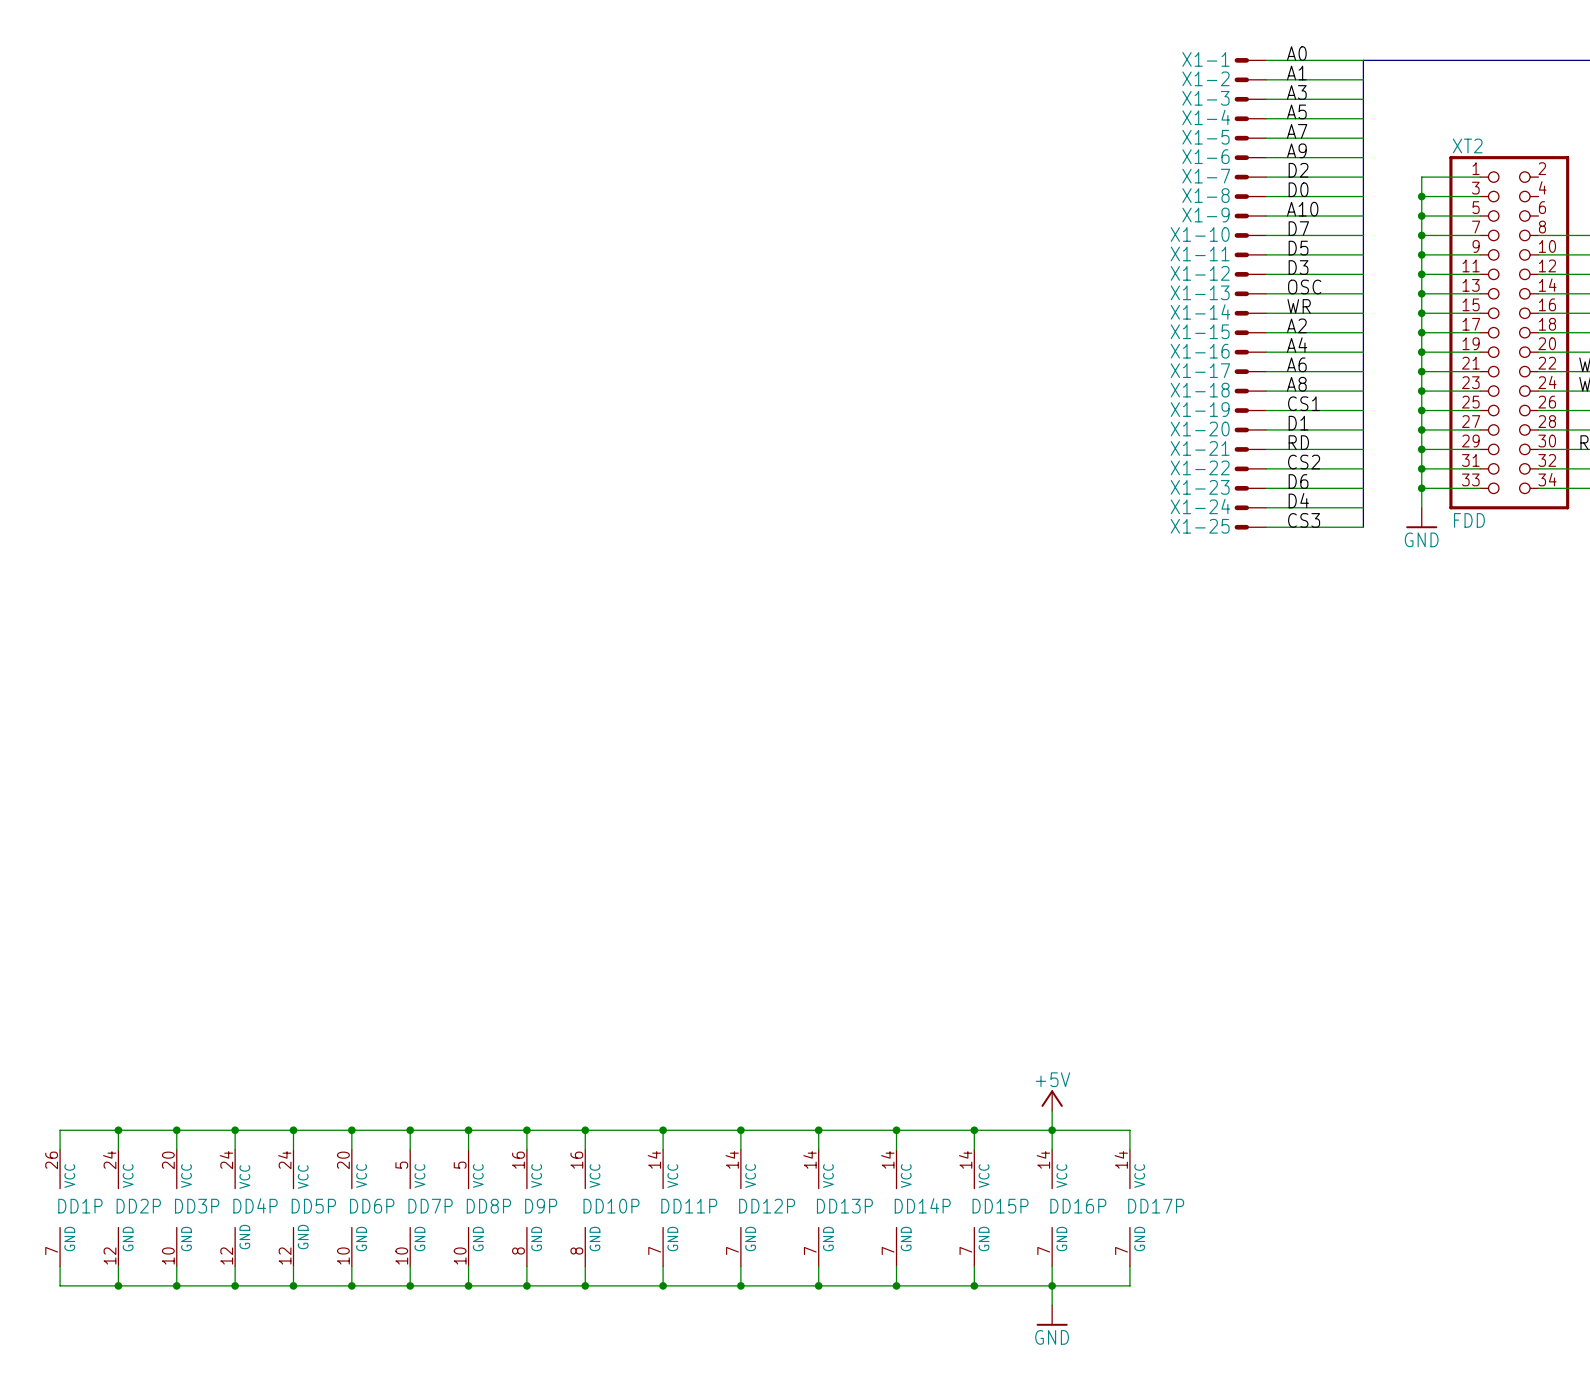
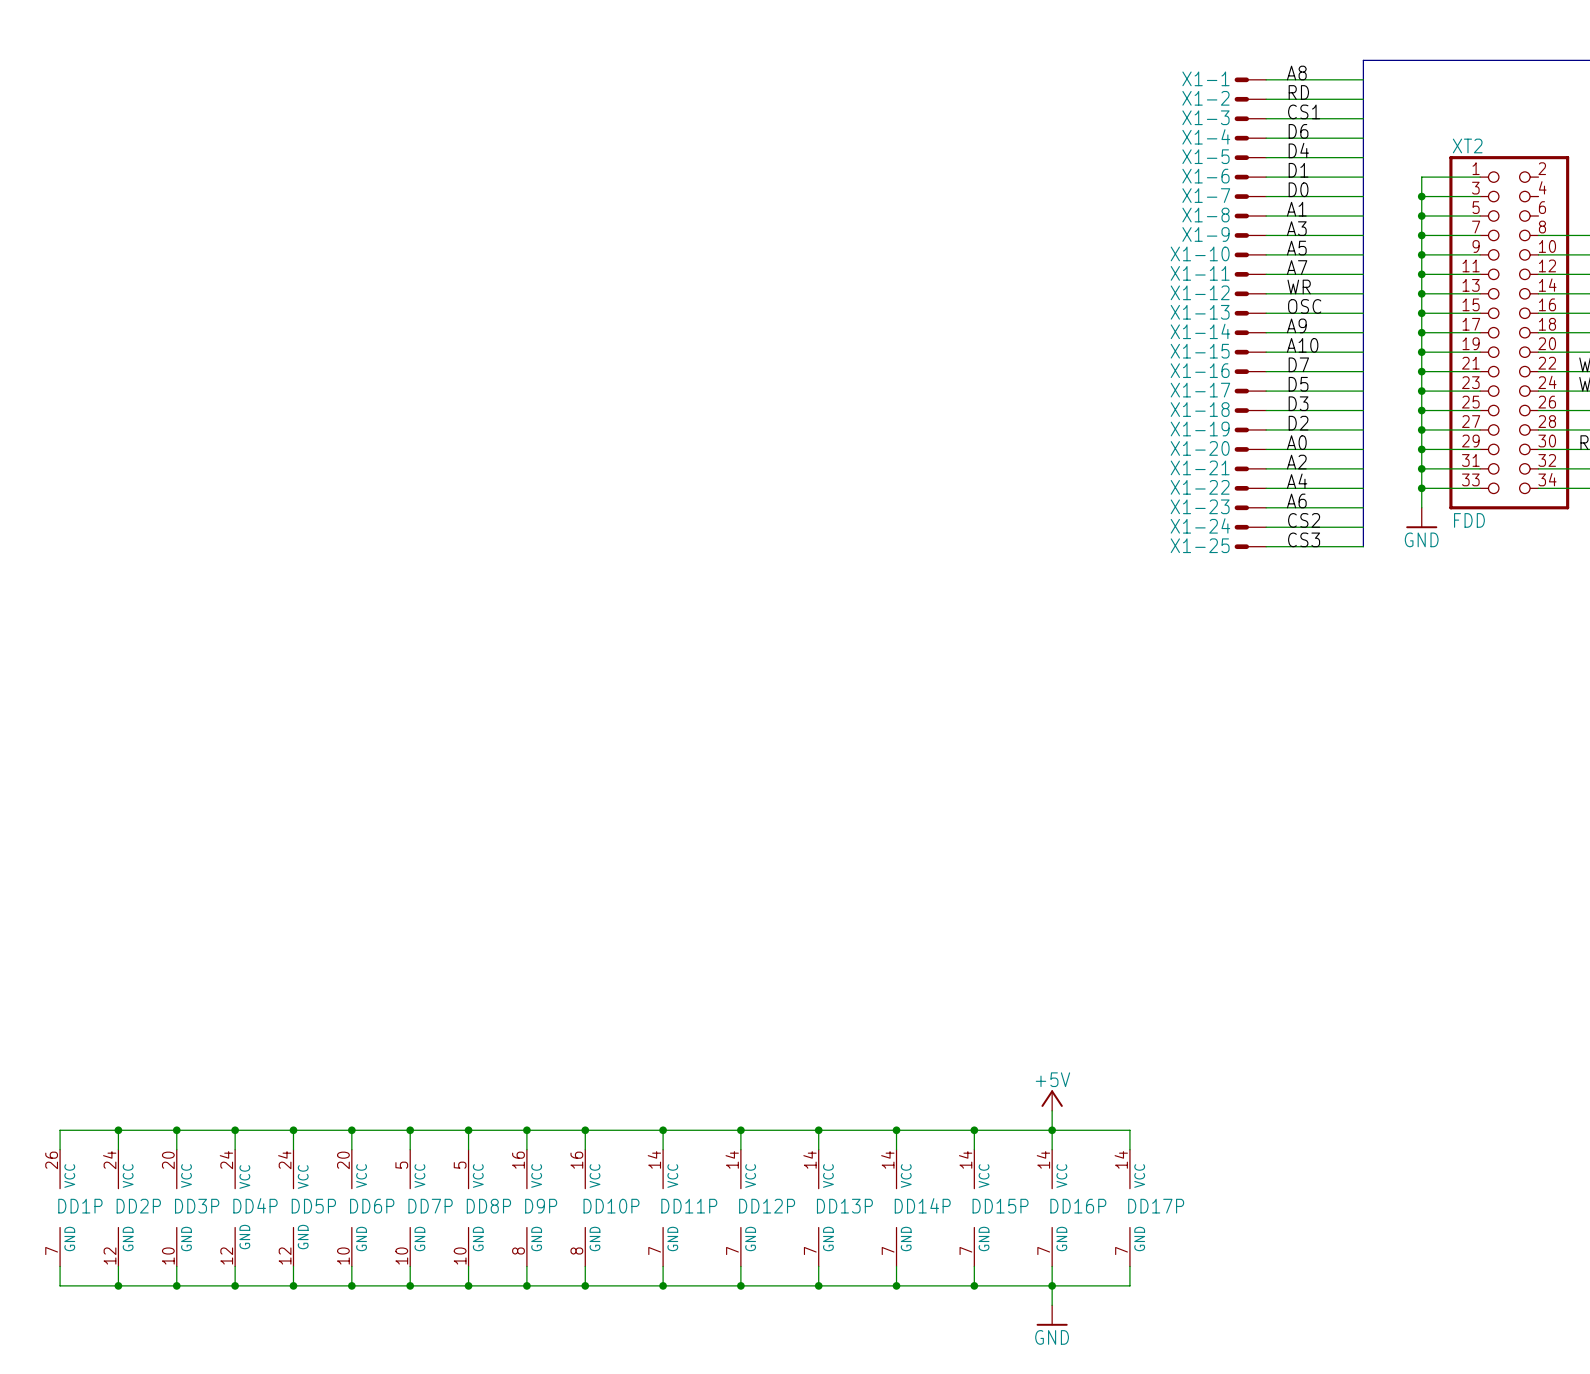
label: A0 (1296, 53) -> none
X1-1: (1250, 60) -> none
wire: (1266, 60) (1363, 60) -> none
label: A1 (1296, 73) -> A8 (1296, 73)
X1-2 name: X1-2 (1205, 78) -> X1-1 (1205, 78)
label: A3 (1296, 92) -> RD (1298, 92)
X1-3 name: X1-3 (1205, 98) -> X1-2 (1205, 98)
label: A5 (1296, 111) -> CS1 (1304, 111)
X1-4 name: X1-4 (1206, 117) -> X1-3 (1205, 117)
label: A7 (1297, 131) -> D6 (1298, 131)
X1-5 name: X1-5 (1205, 137) -> X1-4 (1206, 136)
label: A9 (1296, 150) -> D4 (1298, 150)
X1-6 name: X1-6 (1205, 156) -> X1-5 (1205, 156)
label: D2 (1298, 170) -> D1 (1298, 170)
X1-7 name: X1-7 (1206, 176) -> X1-6 (1205, 176)
X1-8 name: X1-8 (1205, 195) -> X1-7 (1206, 195)
label: A10 (1302, 209) -> A1 (1296, 209)
X1-9 name: X1-9 (1205, 215) -> X1-8 (1205, 215)
label: D7 (1298, 228) -> A3 (1296, 228)
X1-10 name: X1-10 (1200, 234) -> X1-9 (1205, 234)
label: D5 (1298, 248) -> A5 (1296, 248)
X1-11 name: X1-11 (1200, 253) -> X1-10 (1200, 253)
label: D3 (1298, 267) -> A7 (1297, 267)
X1-12 name: X1-12 (1200, 273) -> X1-11 (1200, 273)
label: OSC (1304, 287) -> WR (1299, 287)
X1-13 name: X1-13 (1200, 292) -> X1-12 (1200, 292)
label: WR (1299, 306) -> OSC (1304, 306)
X1-14 name: X1-14 (1200, 311) -> X1-13 (1200, 312)
label: A2 (1296, 325) -> A9 (1296, 325)
X1-15 name: X1-15 (1200, 331) -> X1-14 (1200, 331)
label: A4 (1297, 345) -> A10 (1302, 345)
X1-16 name: X1-16 (1200, 351) -> X1-15 (1200, 351)
label: A6 (1296, 364) -> D7 (1298, 364)
X1-17 name: X1-17 (1200, 370) -> X1-16 (1200, 370)
label: A8 (1296, 384) -> D5 (1298, 384)
X1-18 name: X1-18 (1200, 390) -> X1-17 (1200, 390)
label: CS1 (1304, 403) -> D3 (1298, 403)
X1-19 name: X1-19 (1200, 409) -> X1-18 (1200, 409)
label: D1 (1298, 423) -> D2 (1298, 423)
X1-20 name: X1-20 (1200, 429) -> X1-19 (1200, 429)
label: RD (1298, 442) -> A0 (1296, 442)
X1-21 name: X1-21 (1200, 448) -> X1-20 (1200, 448)
label: CS2 (1304, 462) -> A2 (1296, 462)
X1-22 name: X1-22 (1200, 467) -> X1-21 (1200, 467)
label: D6 (1298, 481) -> A4 (1297, 481)
X1-23 name: X1-23 (1200, 487) -> X1-22 (1200, 487)
label: D4 (1298, 500) -> A6 (1296, 500)
X1-24 name: X1-24 (1200, 506) -> X1-23 (1200, 506)
label: CS3 (1304, 520) -> CS2 (1304, 520)
X1-25 name: X1-25 (1200, 526) -> X1-24 (1200, 525)
bus: none -> (1363, 527) (1363, 546)
label: none -> CS3 (1304, 539)
X1-25: none -> (1250, 546)
wire: none -> (1266, 546) (1363, 546)

